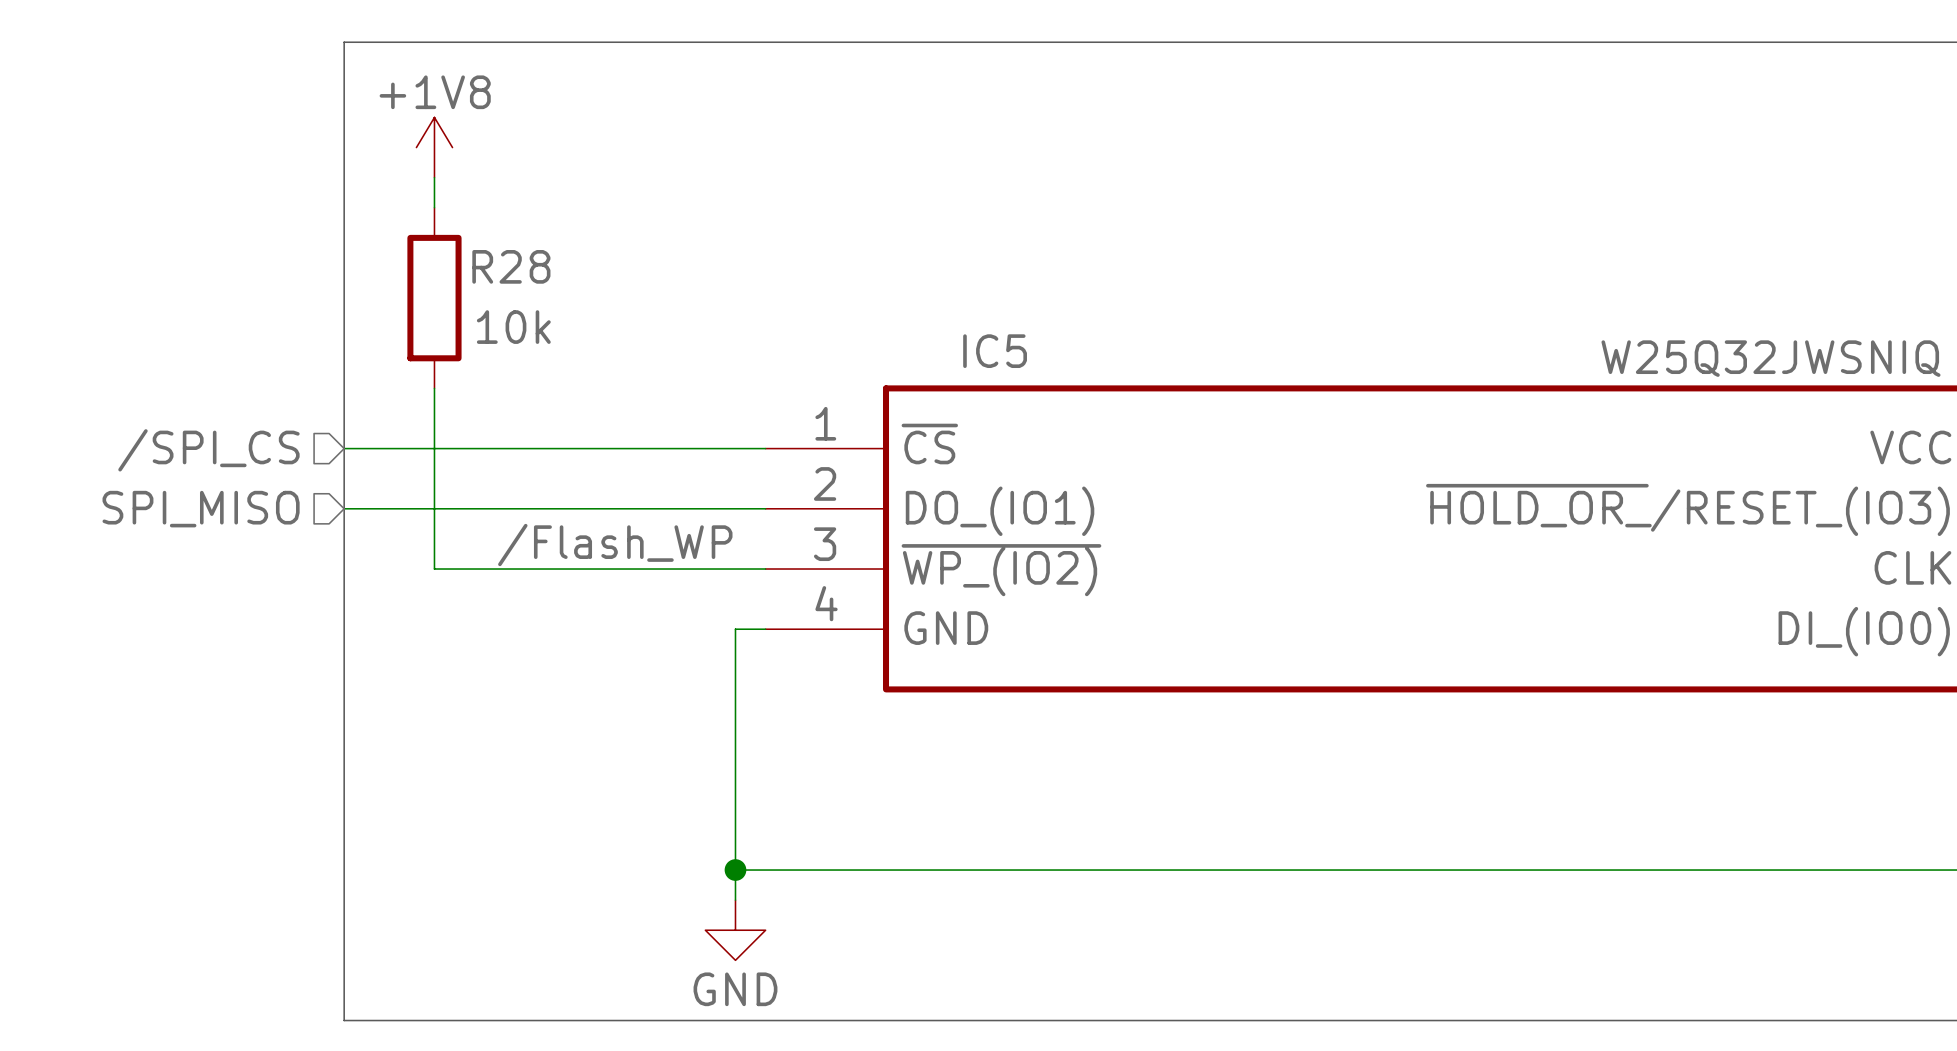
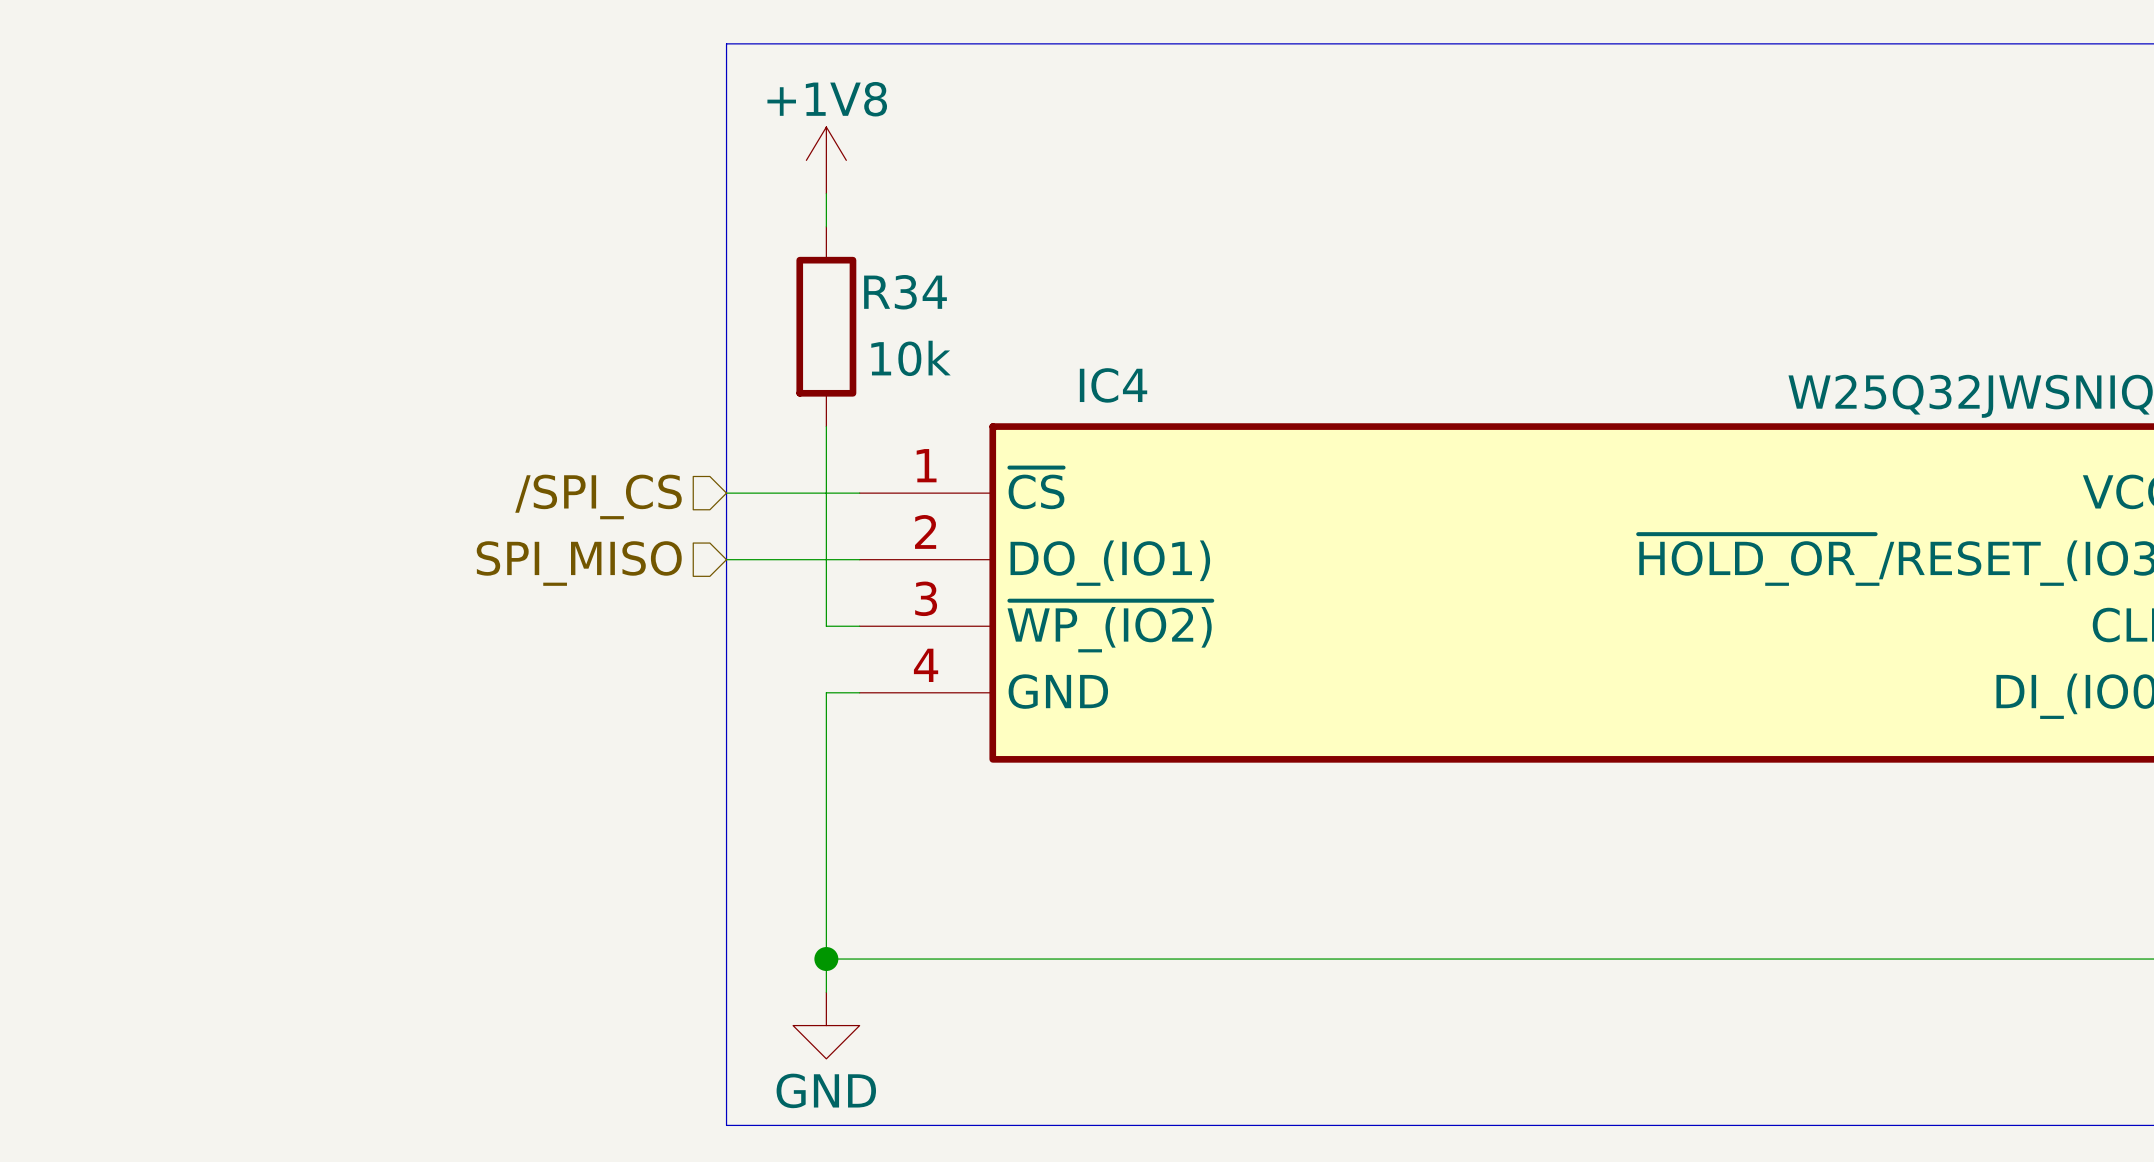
line: (645, 42) (344, 42) (344, 1020) (645, 1020) -> (726, 43) (726, 1125)
power symbol position: +1V8 (434, 147) -> +1V8 (826, 160)
wire: (434, 177) (434, 207) -> (826, 193) (826, 226)
R28: 10k (434, 298) -> none
R34: none -> 10k (826, 326)
IC5 name: IC5 (995, 351) -> IC4 (1113, 385)
wire: (434, 388) (434, 569) (735, 569) -> (826, 426) (826, 626)
wire: (344, 448) (645, 448) -> none
hierarchical label position: /SPI_CS (208, 450) -> /SPI_CS (598, 496)
wire: (344, 508) (645, 508) -> none
hierarchical label position: SPI_MISO (201, 509) -> SPI_MISO (579, 563)
label: /Flash_WP (615, 545) -> none

